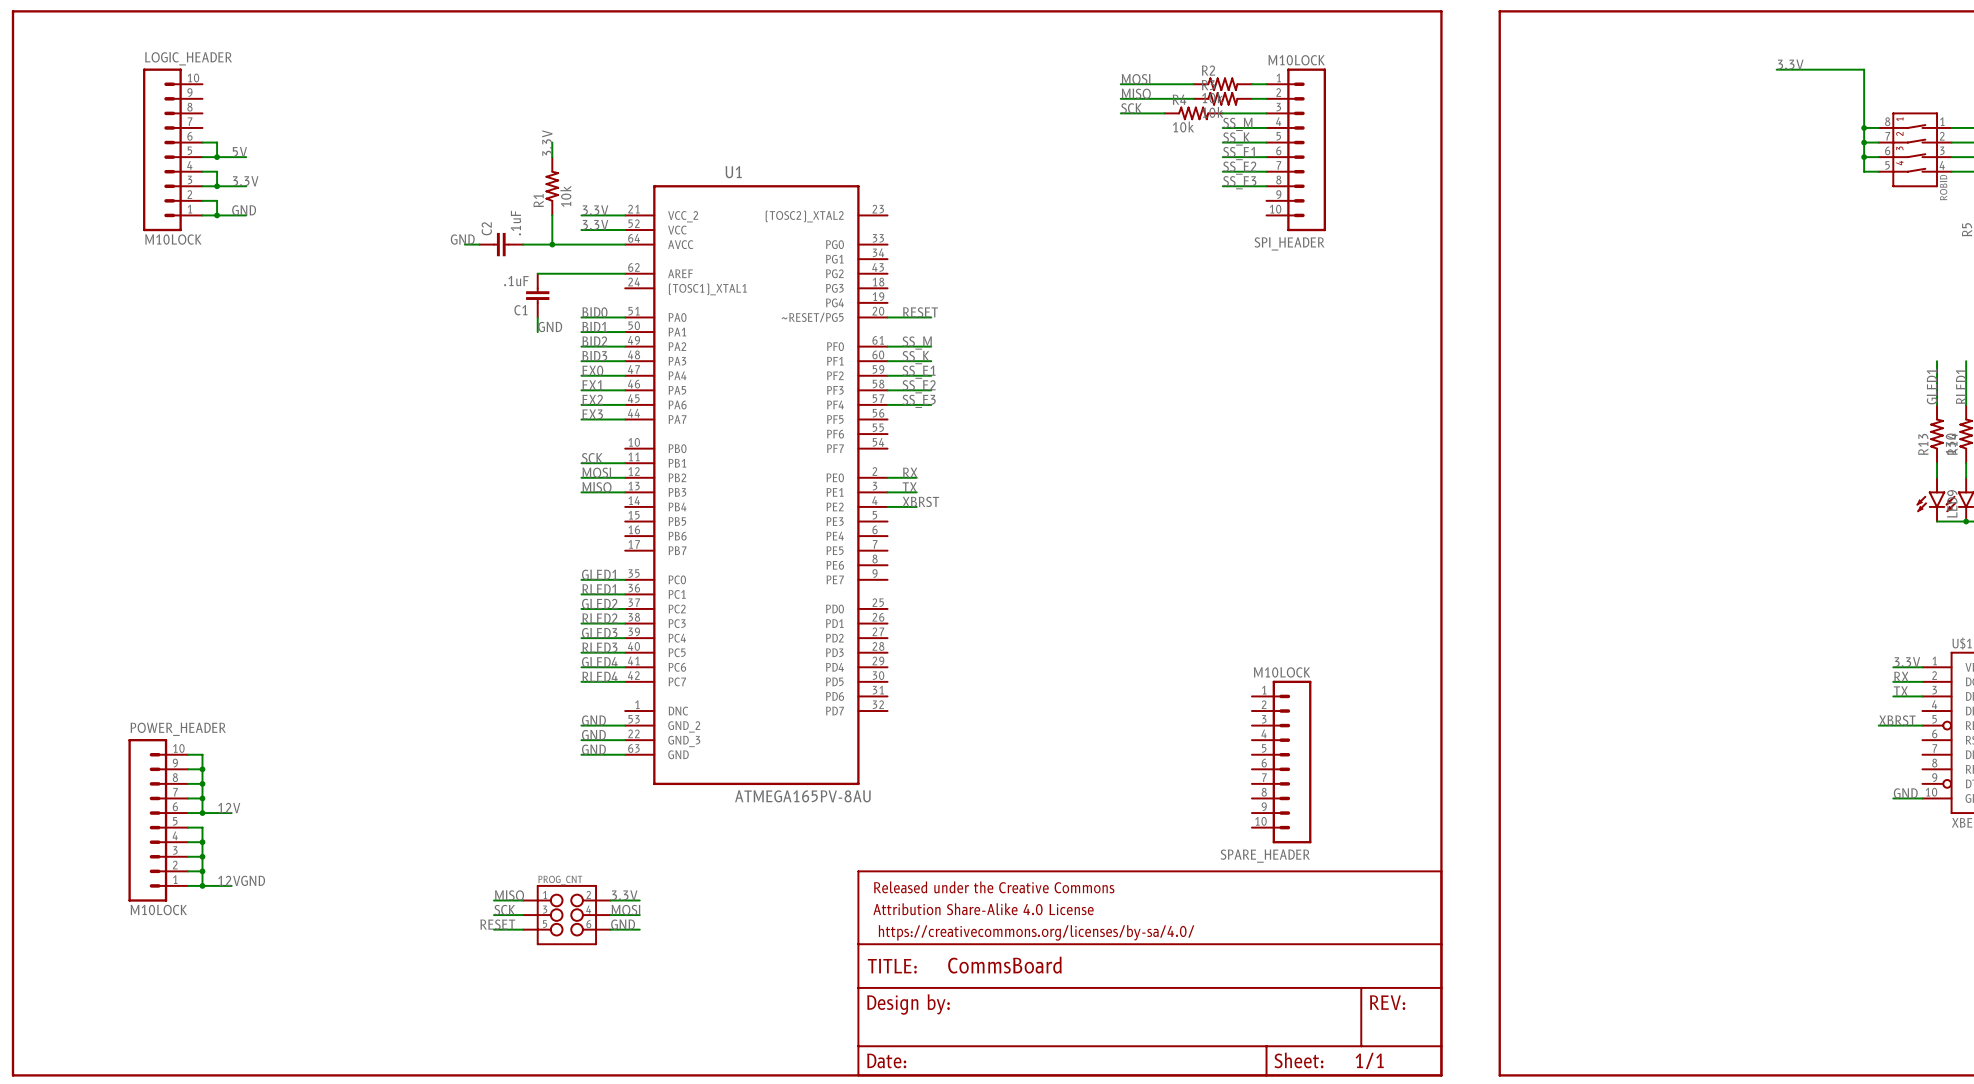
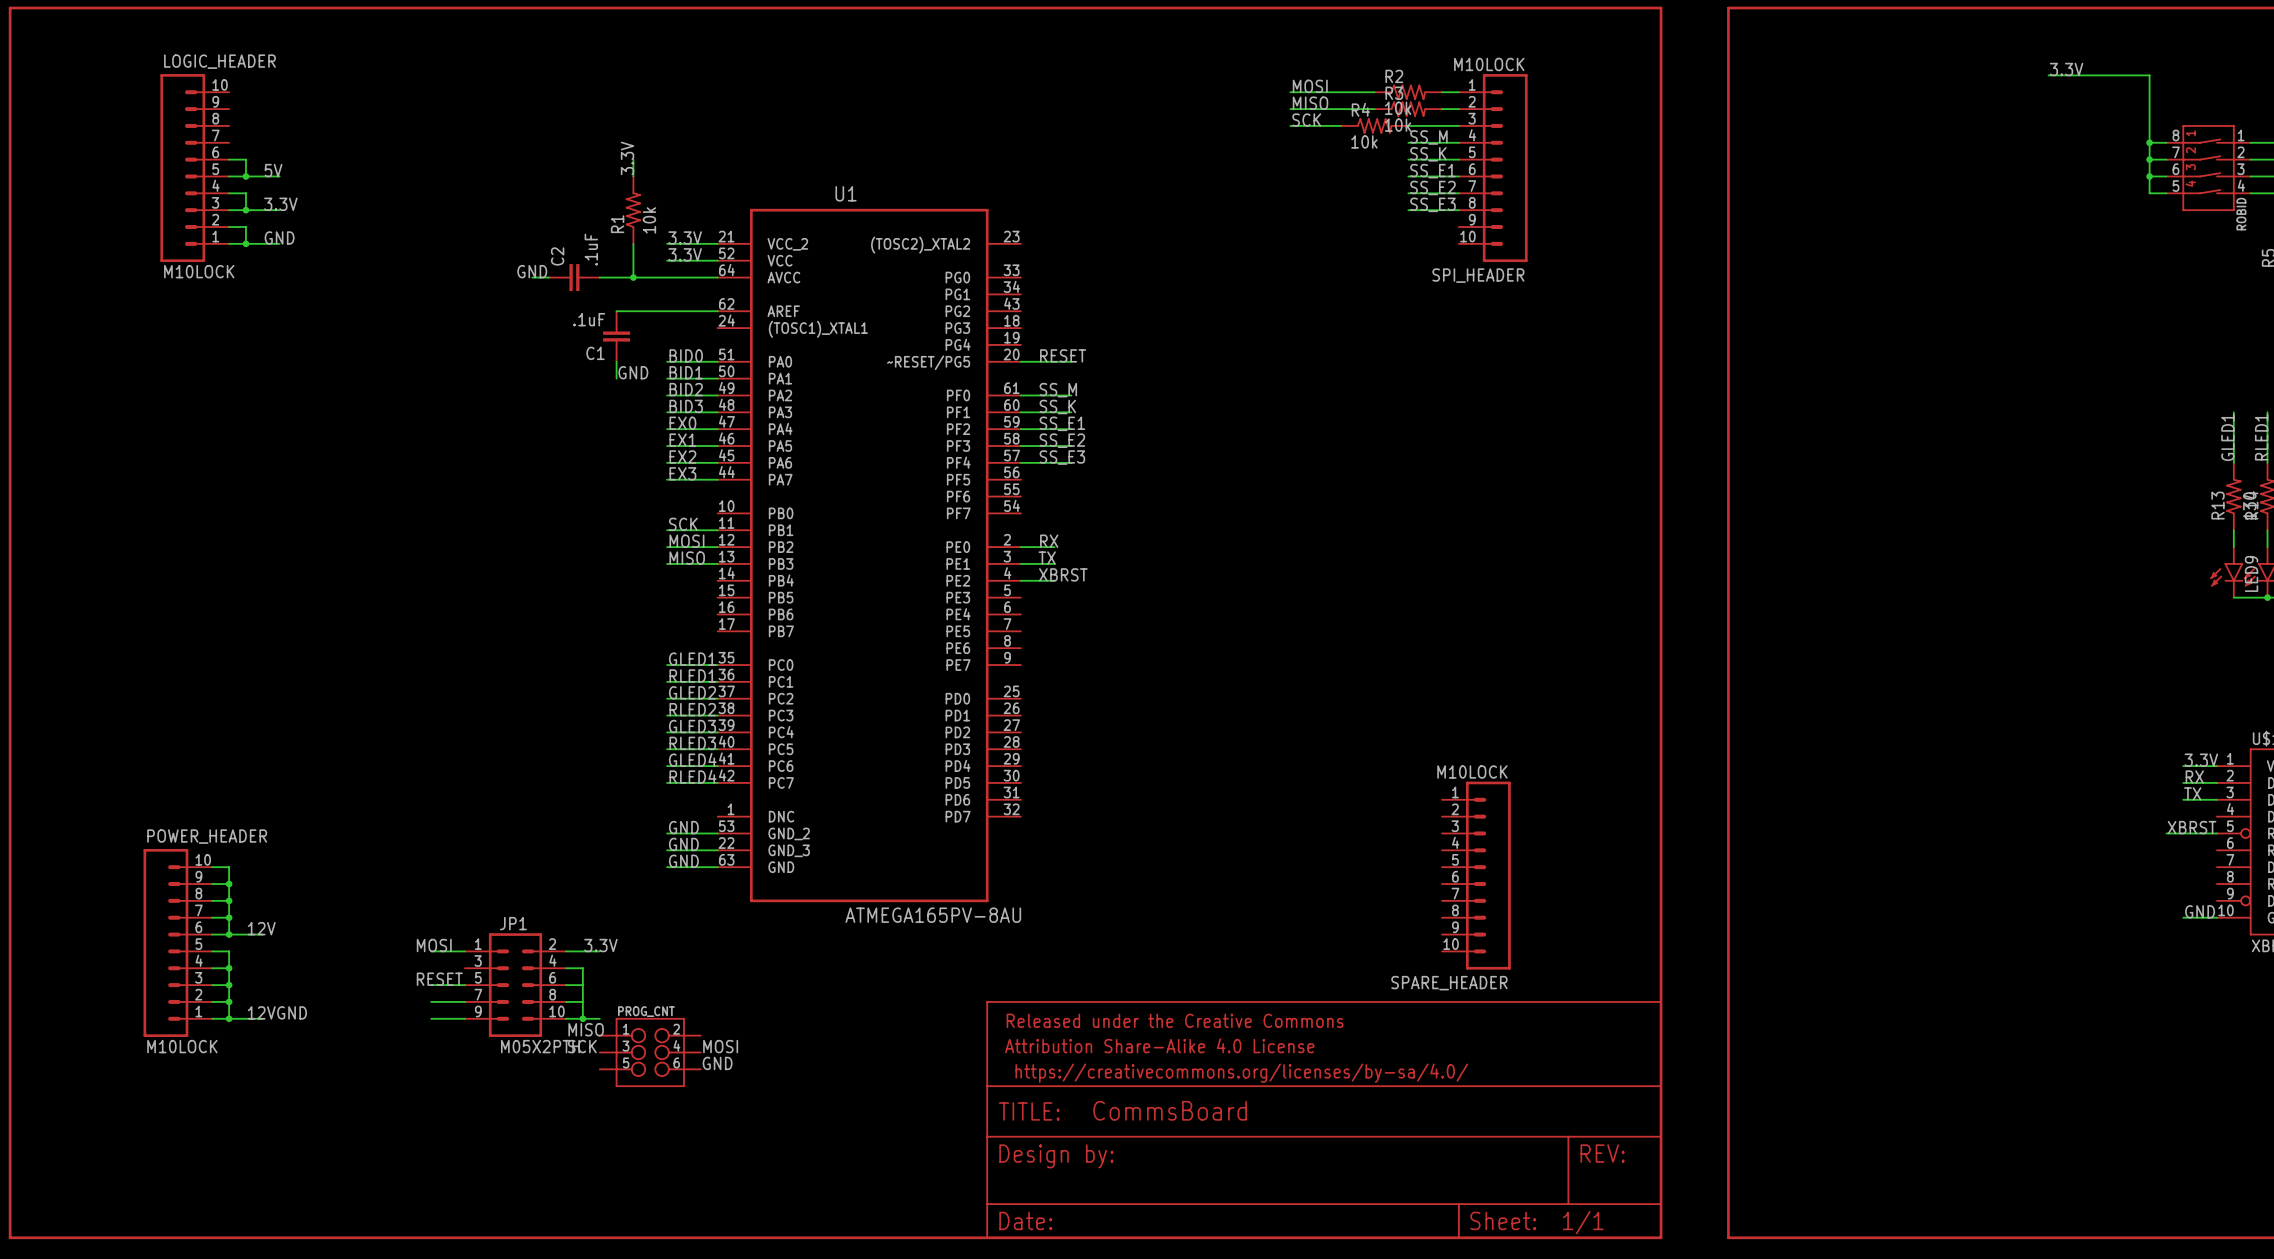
label: none -> MOSI (434, 945)
wire: none -> (431, 951) (464, 951)
wire: none -> (566, 968) (582, 968) (582, 1018)
JP1: none -> M05X2PTH (515, 985)
wire: none -> (566, 985) (582, 985)
wire: none -> (566, 1001) (582, 1001)
junction: none -> (582, 1018)
label position: 3.3V (624, 895) -> 3.3V (600, 945)
wire: (494, 900) (523, 900) -> (431, 985) (464, 985)
wire: (610, 900) (639, 900) -> (566, 951) (599, 951)
wire: (494, 915) (523, 915) -> (431, 1001) (464, 1001)
wire: (610, 915) (639, 915) -> none
label position: RESET (497, 924) -> RESET (439, 979)
wire: (494, 929) (523, 929) -> (431, 1018) (464, 1018)
wire: (610, 929) (639, 929) -> (566, 1018) (599, 1018)

